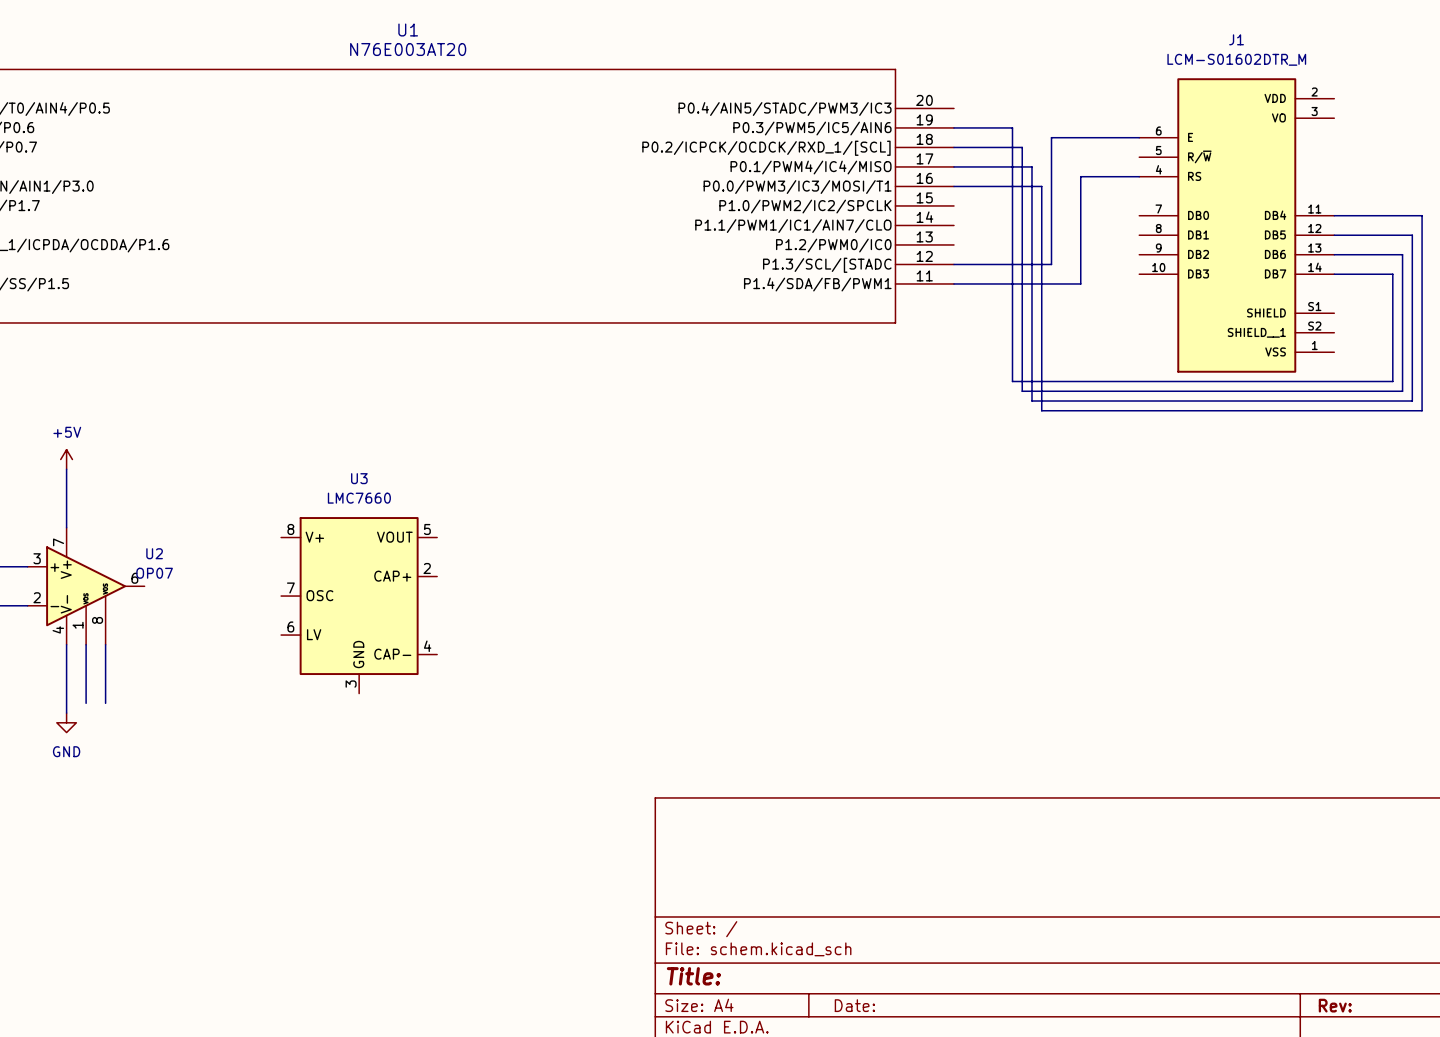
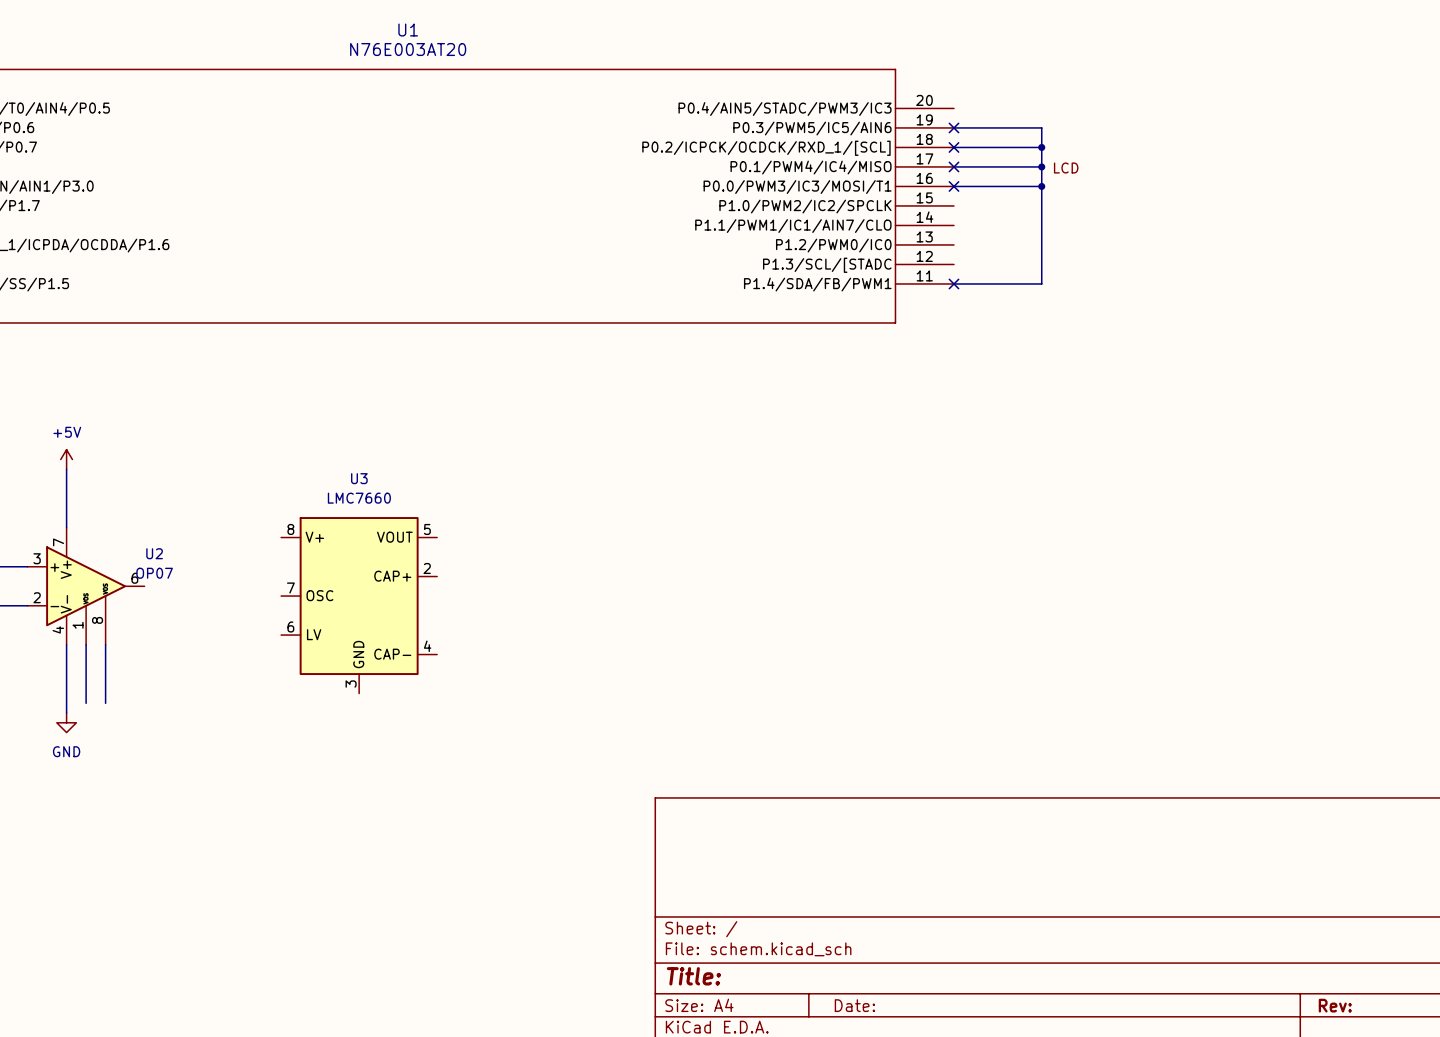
no-connect mark: none -> (953, 127)
wire: (1012, 127) (1012, 381) (1392, 381) (1392, 274) (1334, 274) -> (1012, 127) (1041, 127) (1041, 186)
wire: (1139, 137) (1051, 137) (1051, 264) (953, 264) -> none
no-connect mark: none -> (953, 147)
wire: (1022, 147) (1022, 391) (1402, 391) (1402, 254) (1334, 254) -> (1022, 147) (1041, 147)
junction: none -> (1041, 147)
no-connect mark: none -> (953, 166)
wire: (1032, 166) (1032, 401) (1412, 401) (1412, 235) (1334, 235) -> (1032, 166) (1041, 166)
junction: none -> (1041, 166)
label: none -> LCD (1066, 168)
wire: (1139, 176) (1080, 176) (1080, 283) (1041, 283) (1041, 410) (1422, 410) (1422, 215) (1334, 215) -> none
no-connect mark: none -> (953, 186)
junction: none -> (1041, 186)
J1: LCM-S01602DTR_M (1236, 225) -> none
no-connect mark: none -> (953, 283)

